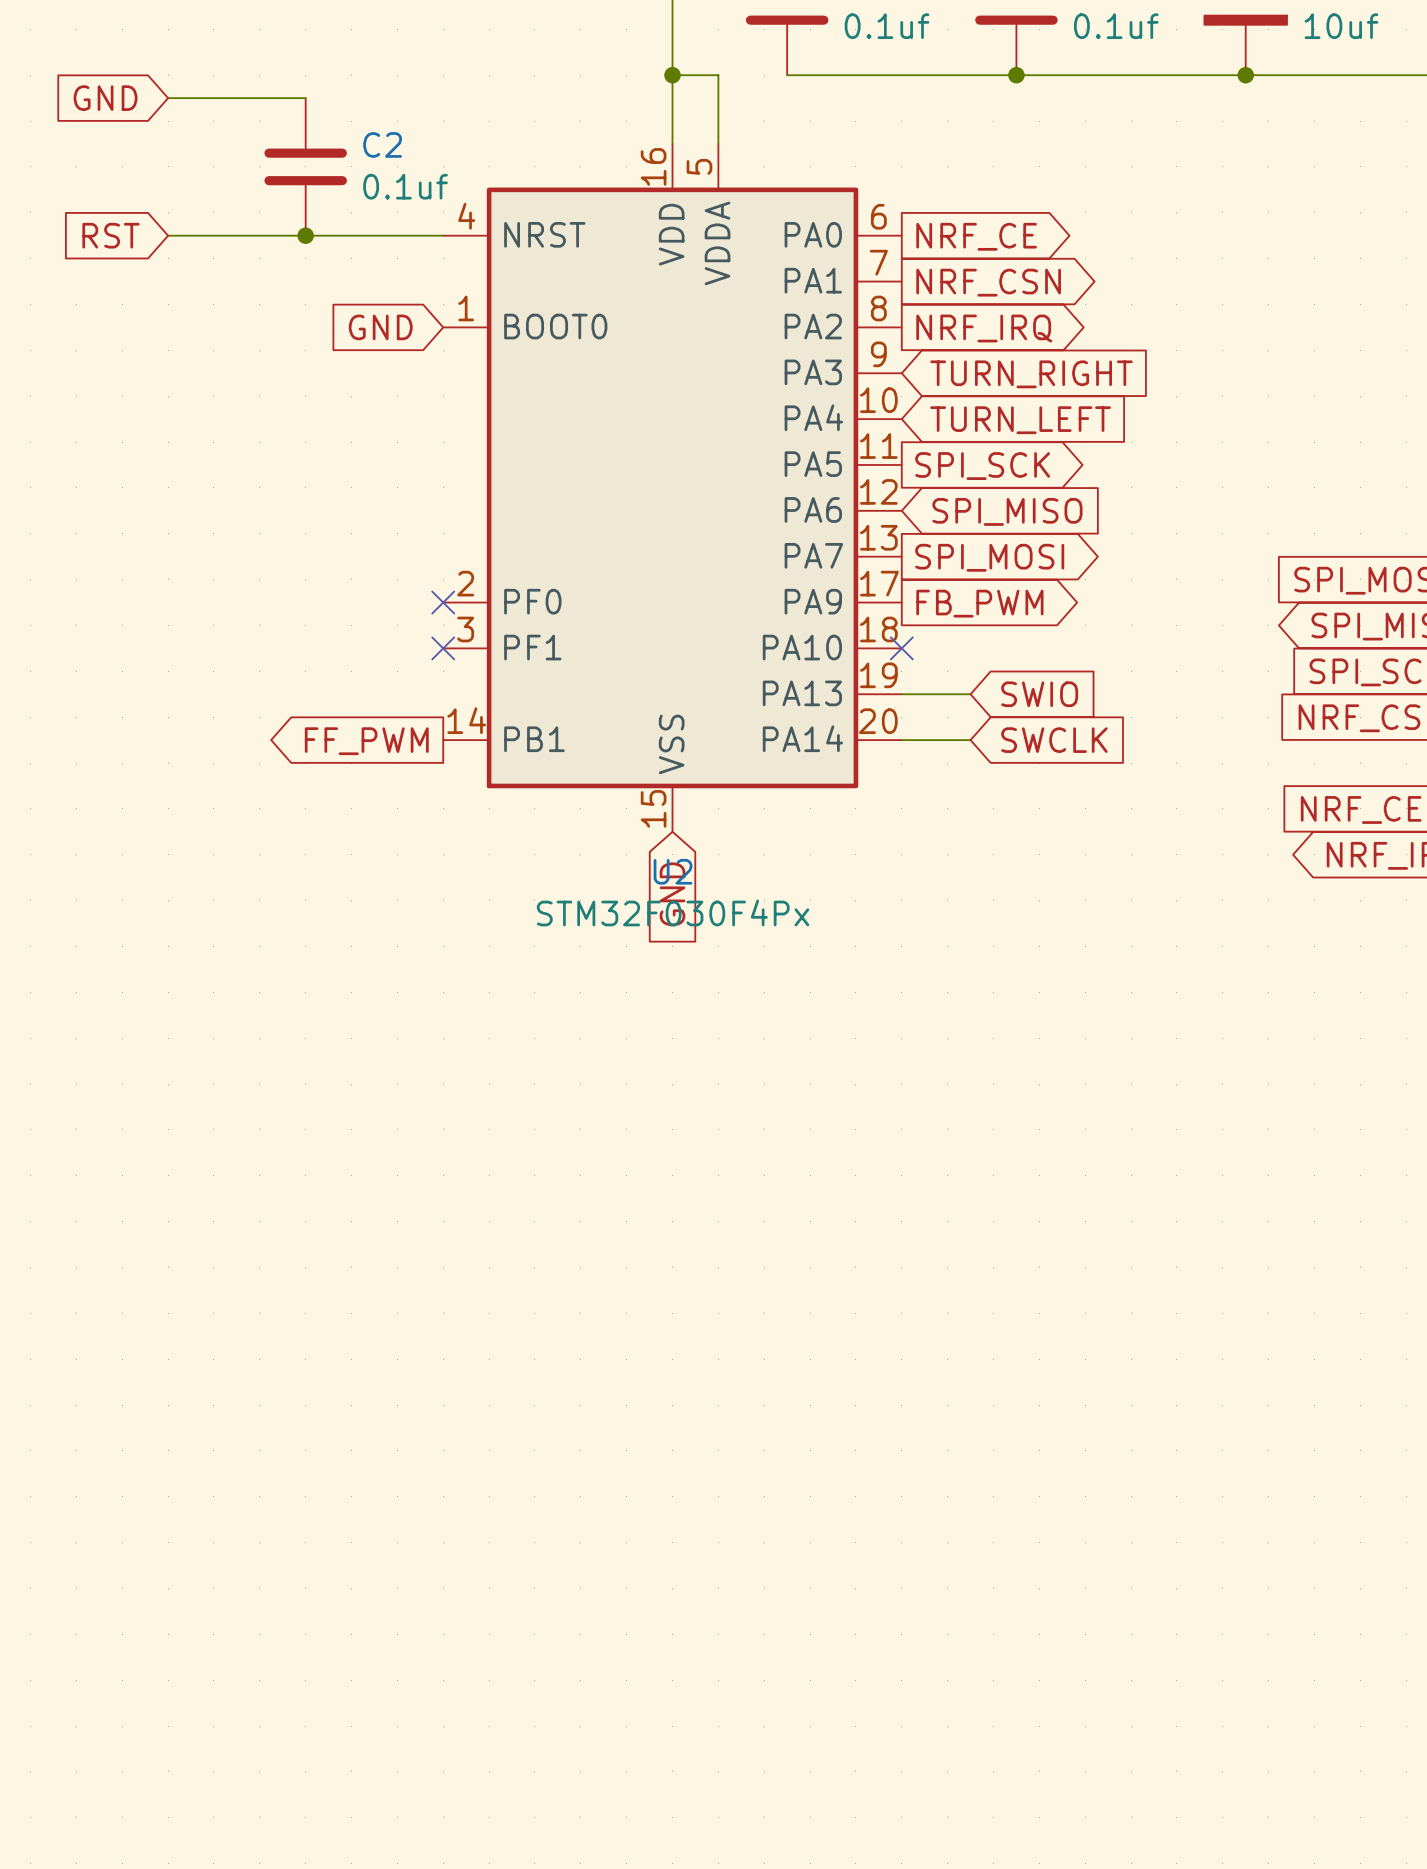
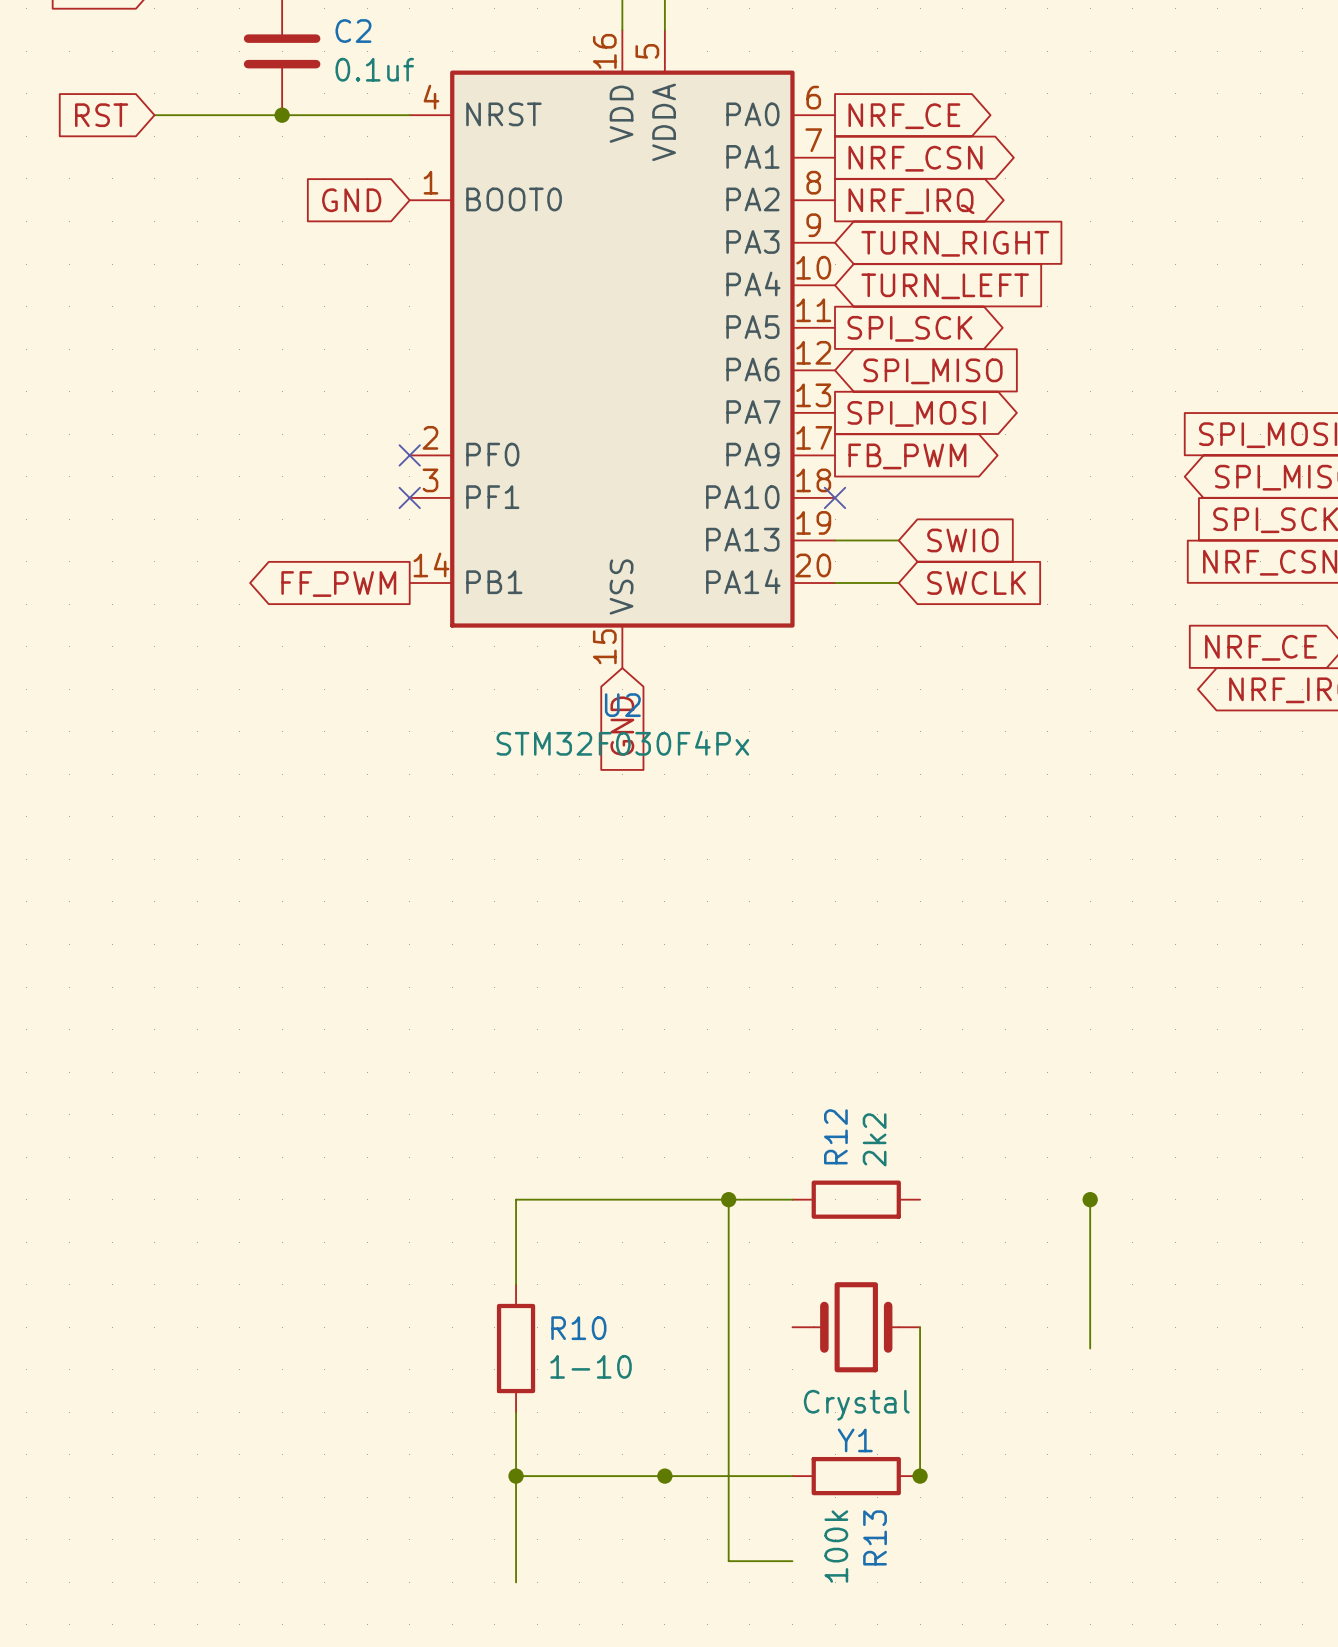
wire: none -> (728, 1199) (728, 1561) (792, 1561)
junction: none -> (728, 1199)
wire: none -> (792, 1199) (516, 1199) (516, 1284)
R12: none -> 2k2 (856, 1199)
wire: none -> (1090, 1199) (1090, 1348)
junction: none -> (1090, 1199)
Y1: none -> Crystal (856, 1327)
wire: none -> (920, 1327) (920, 1476)
R10: none -> 1-10 (516, 1348)
wire: none -> (516, 1412) (516, 1582)
wire: none -> (516, 1476) (792, 1476)
junction: none -> (516, 1476)
junction: none -> (664, 1476)
R13: none -> 100k (856, 1476)
junction: none -> (920, 1476)

